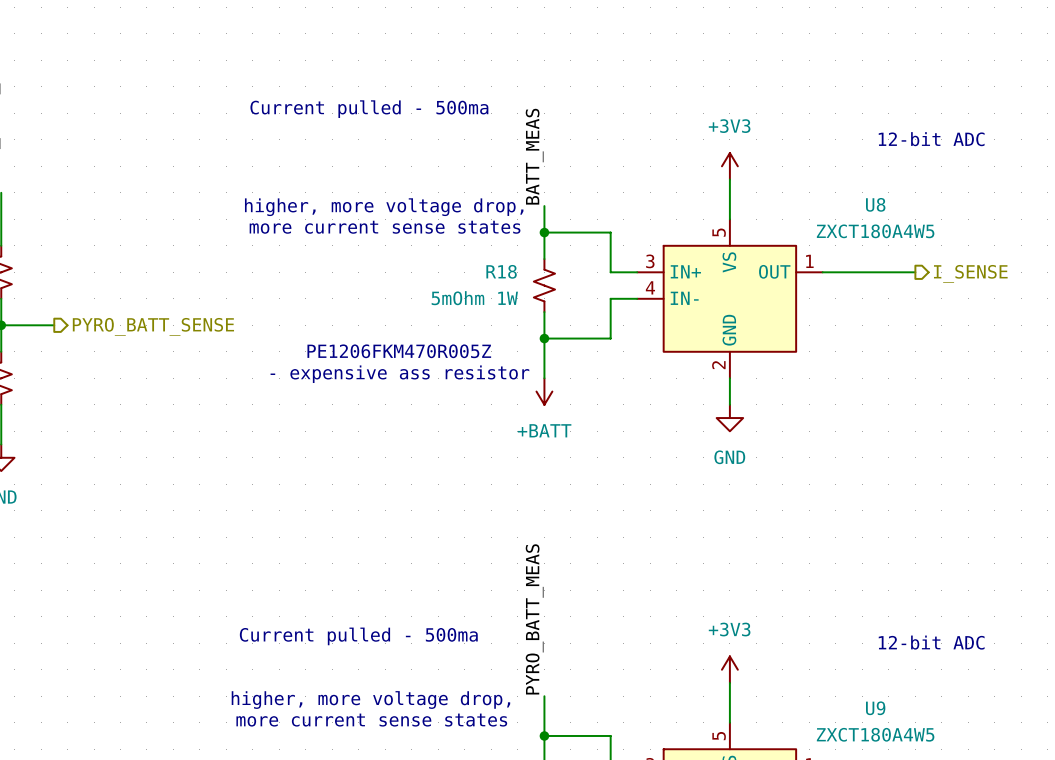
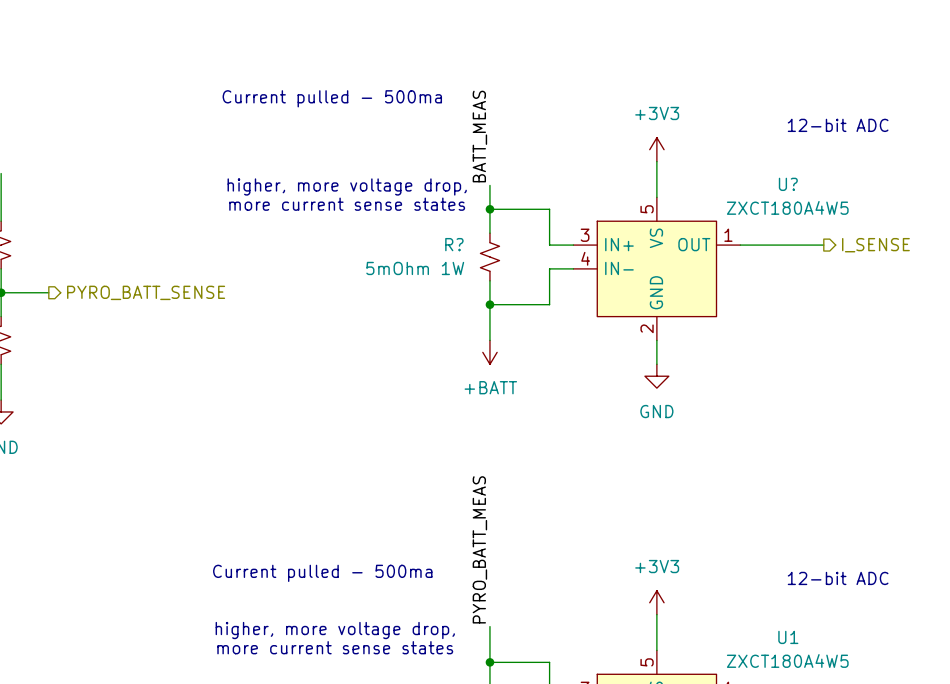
U8 name: U8 (875, 204) -> U? (788, 184)
R18 name: R18 (501, 271) -> R? (454, 244)
text: PE1206FKM470R005Z (399, 351) -> none
text: - expensive ass resistor (399, 374) -> none
U9 name: U9 (875, 708) -> U1 (788, 637)

